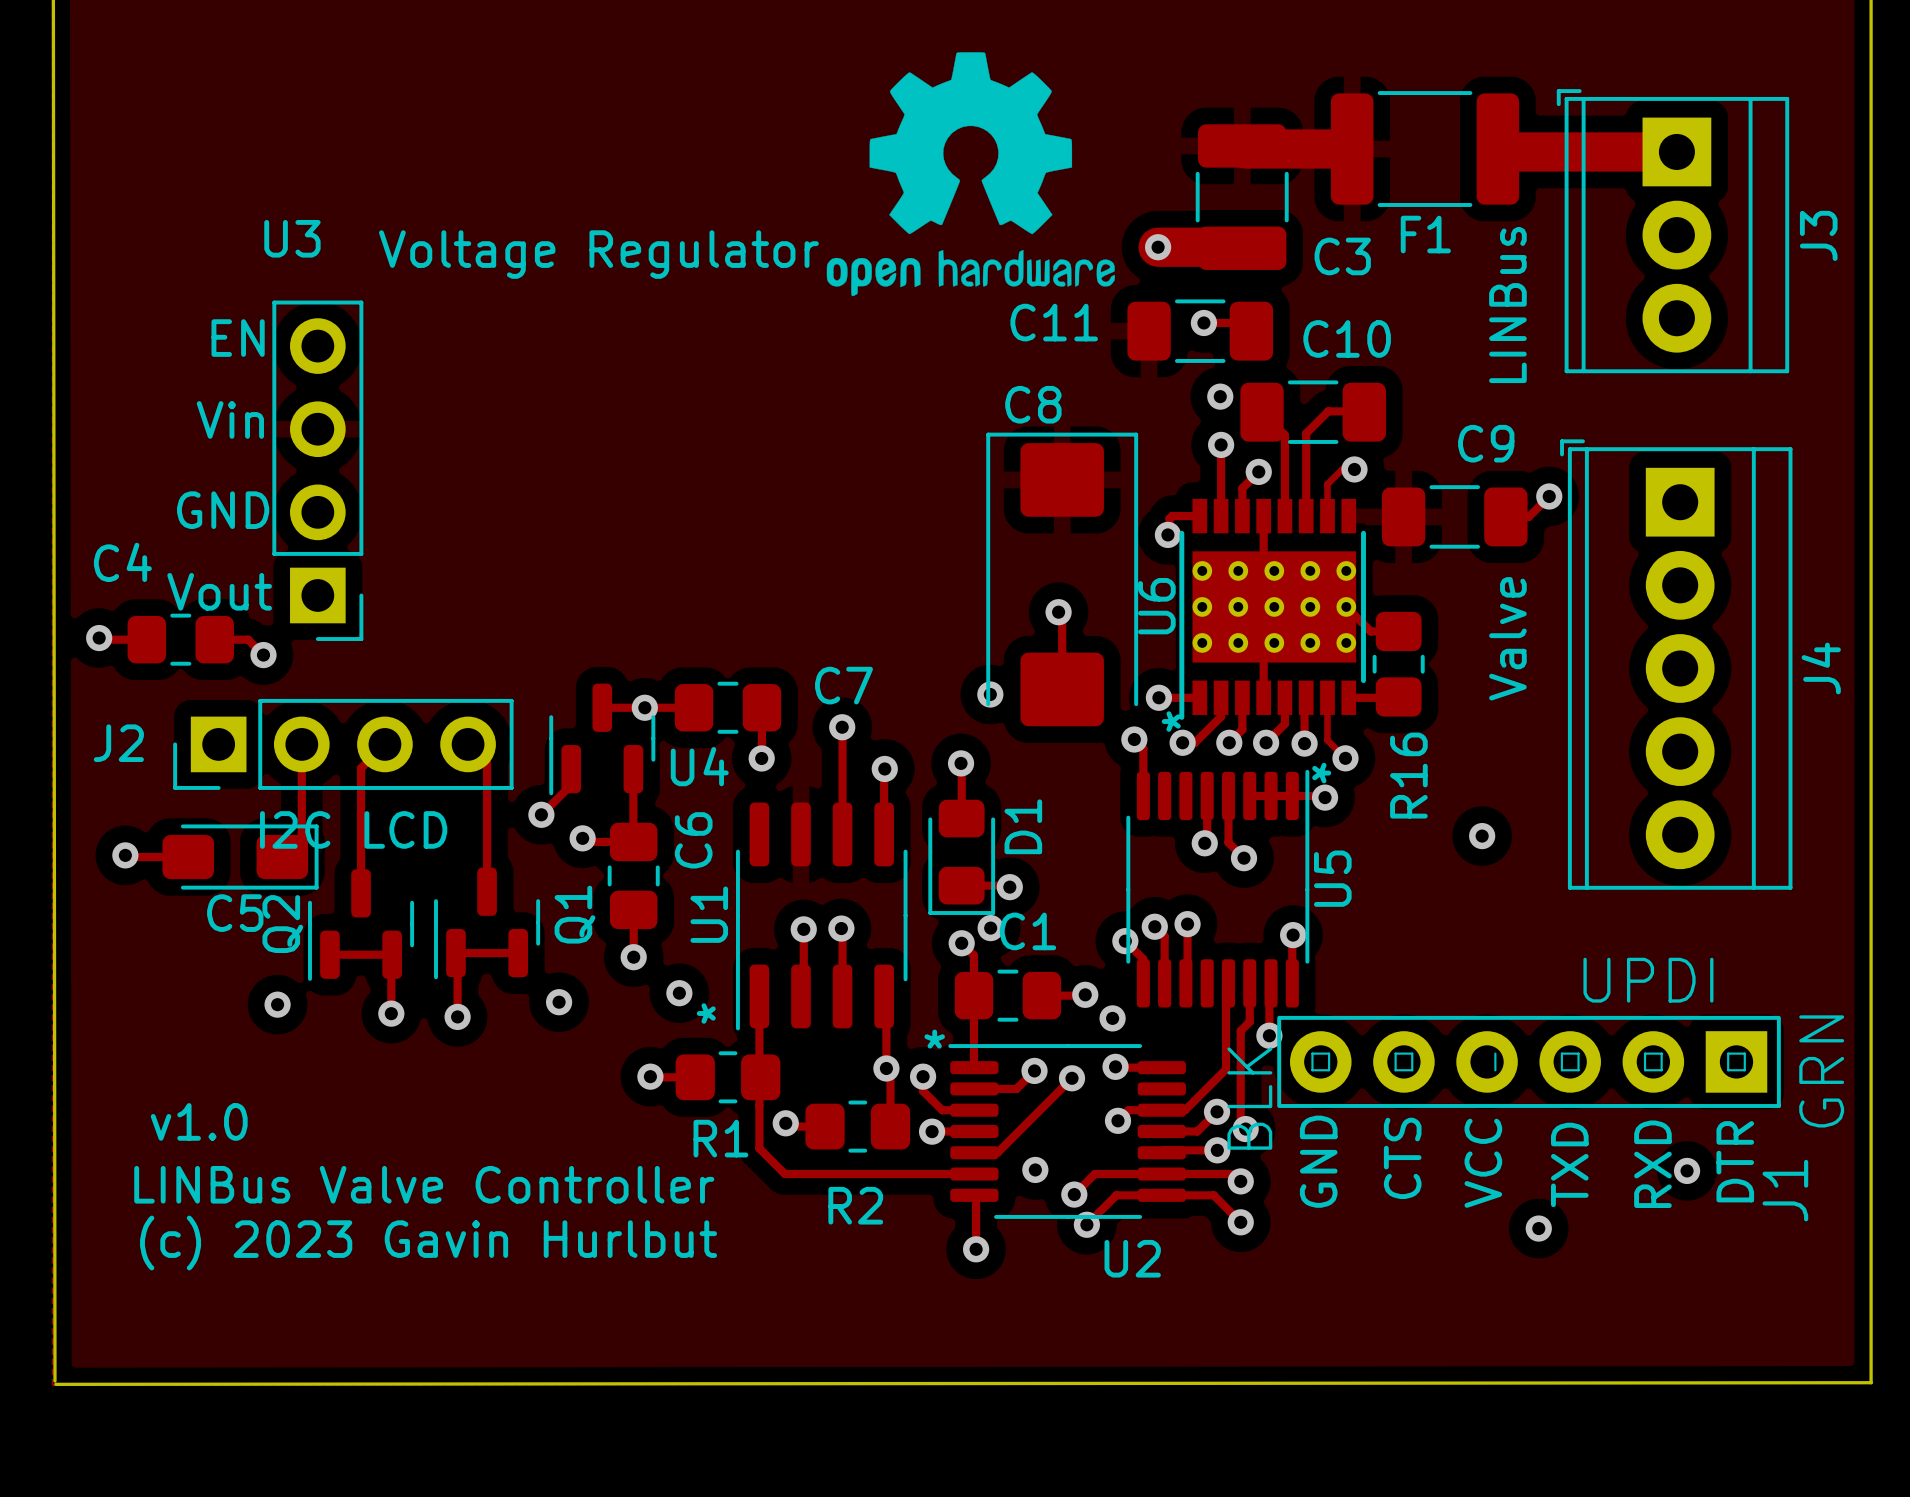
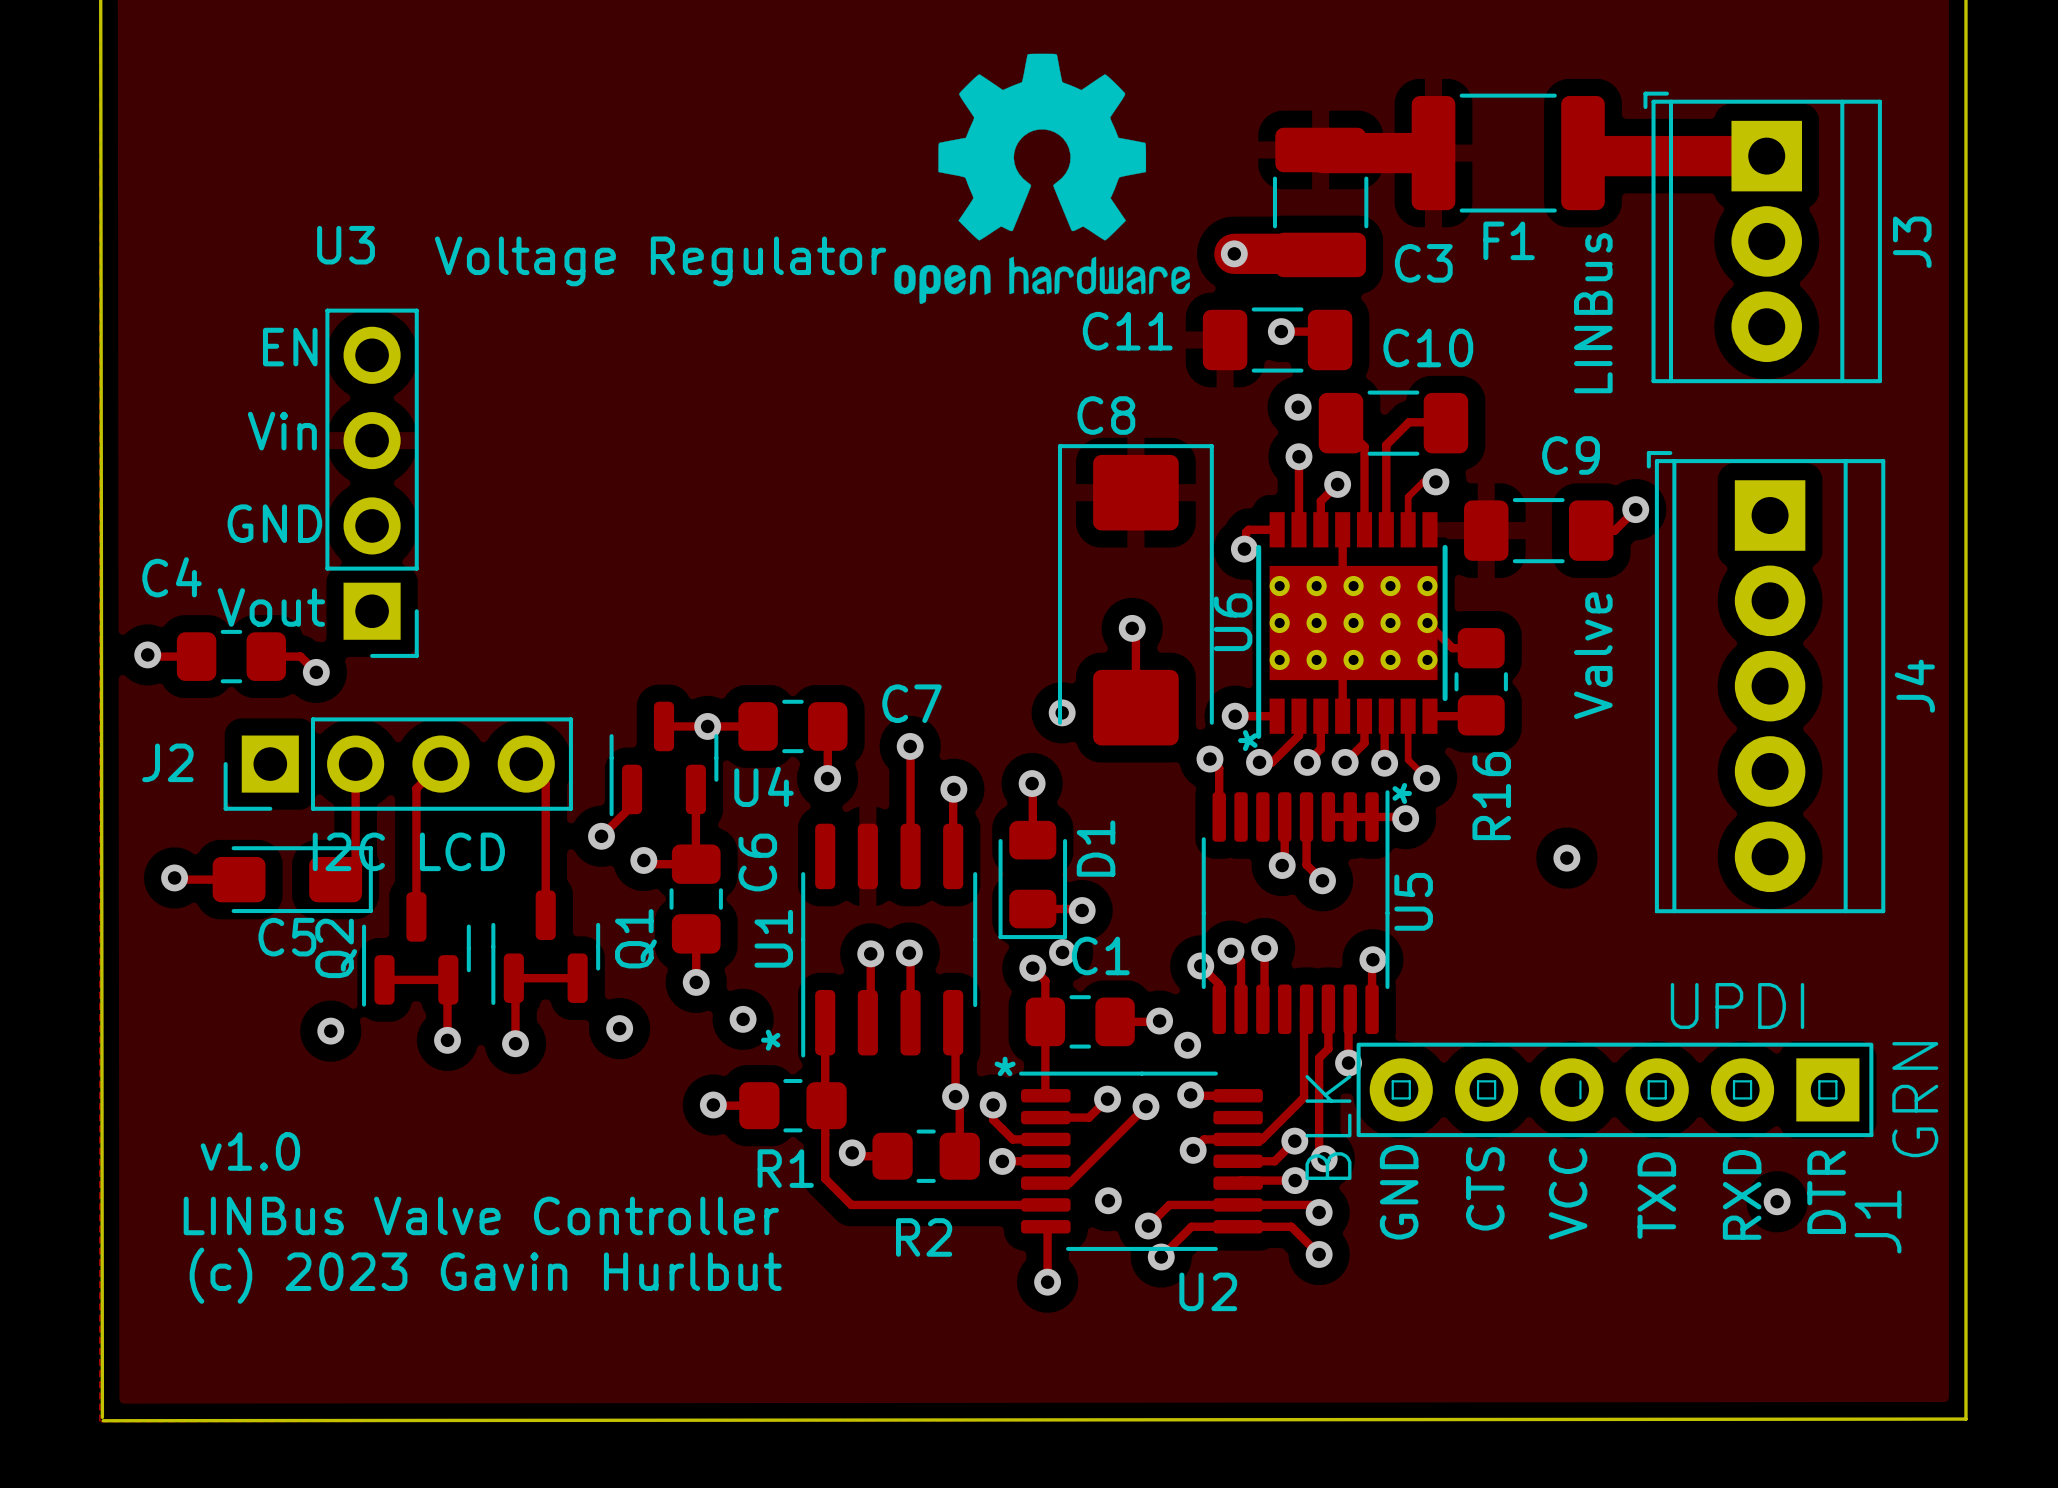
via: (1538, 1228) -> none

